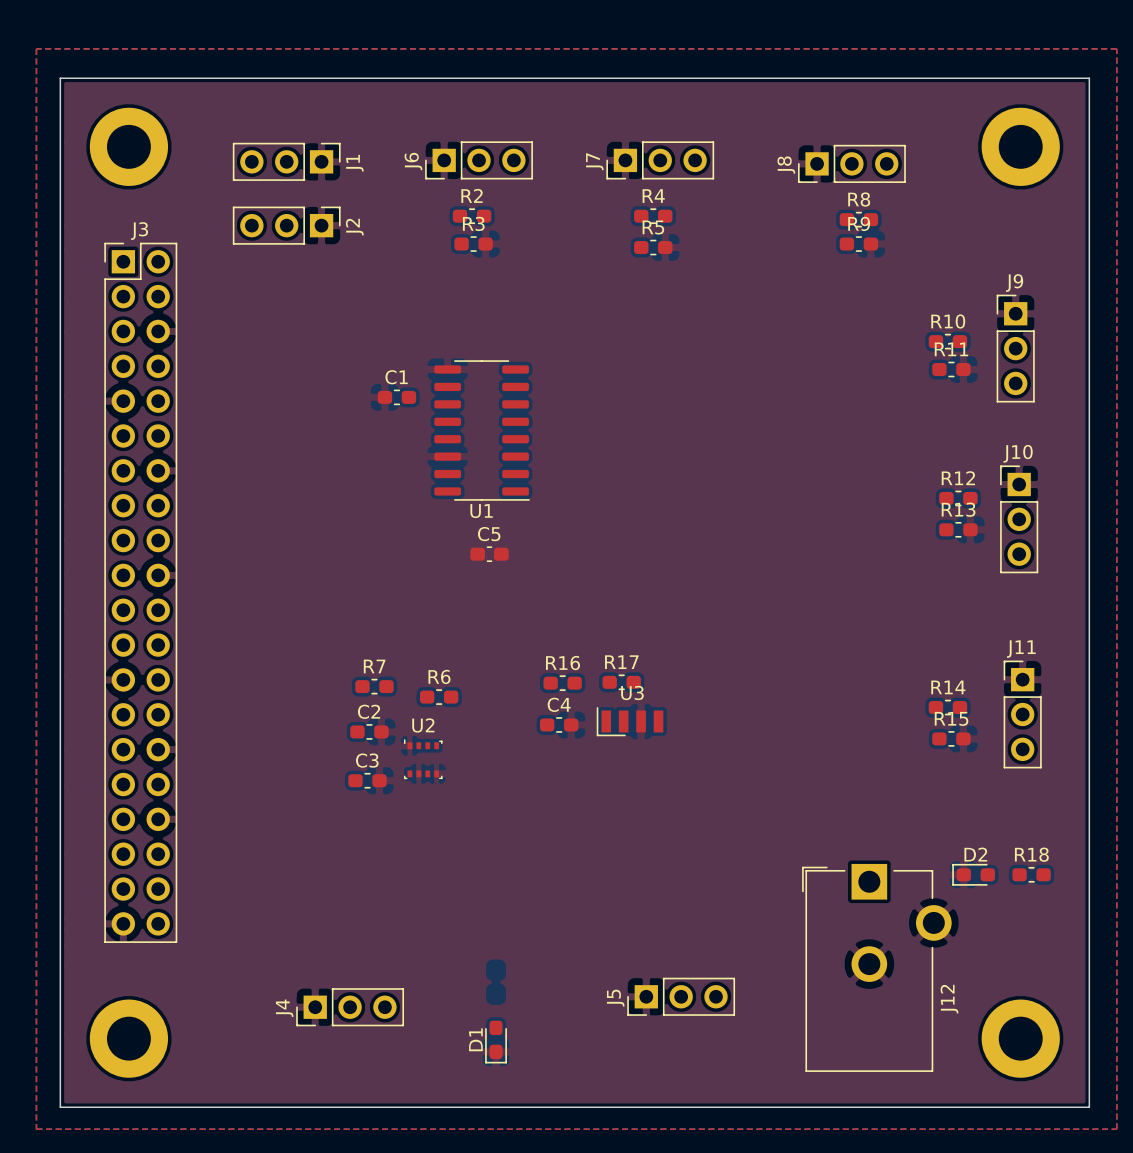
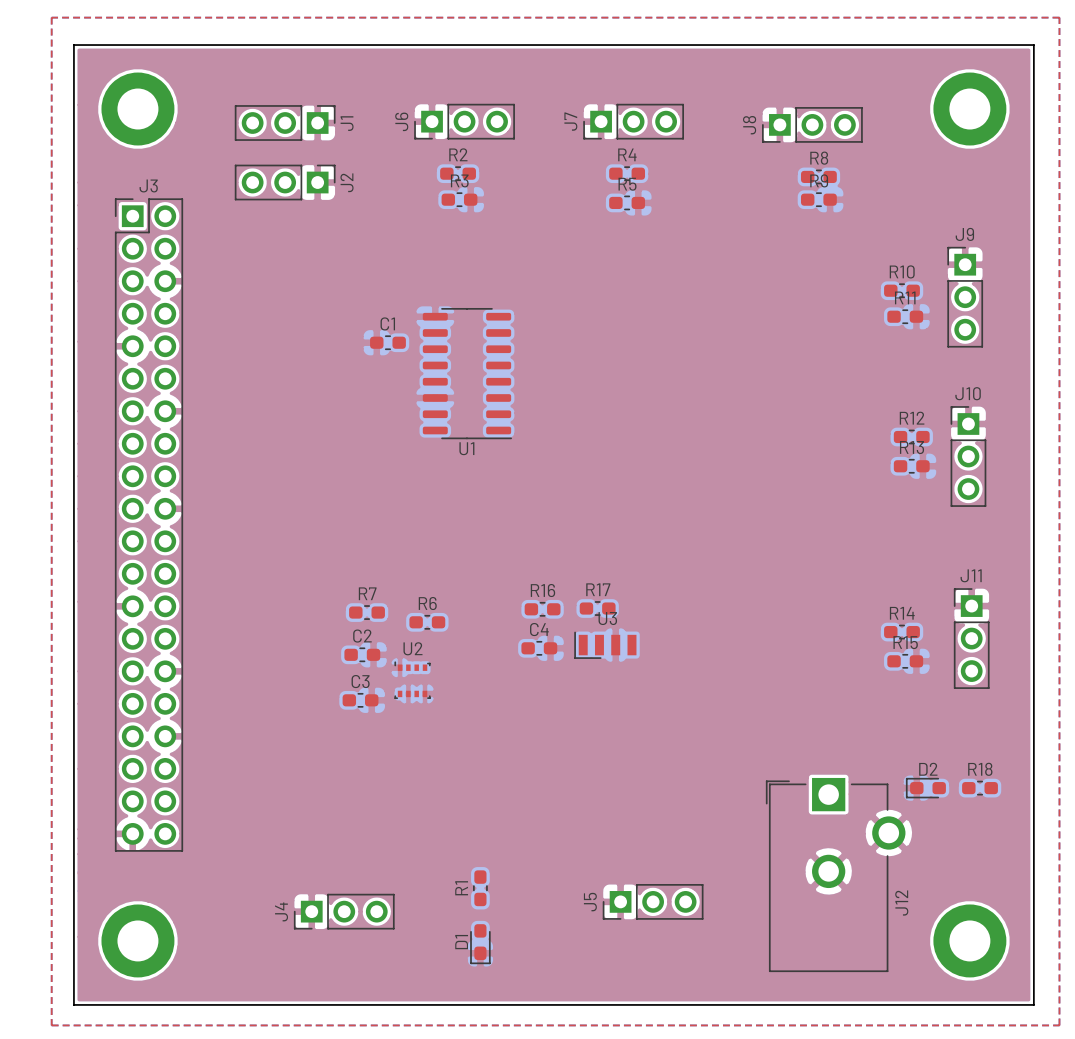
C5: (489, 554) -> none
R1: none -> (480, 888)

